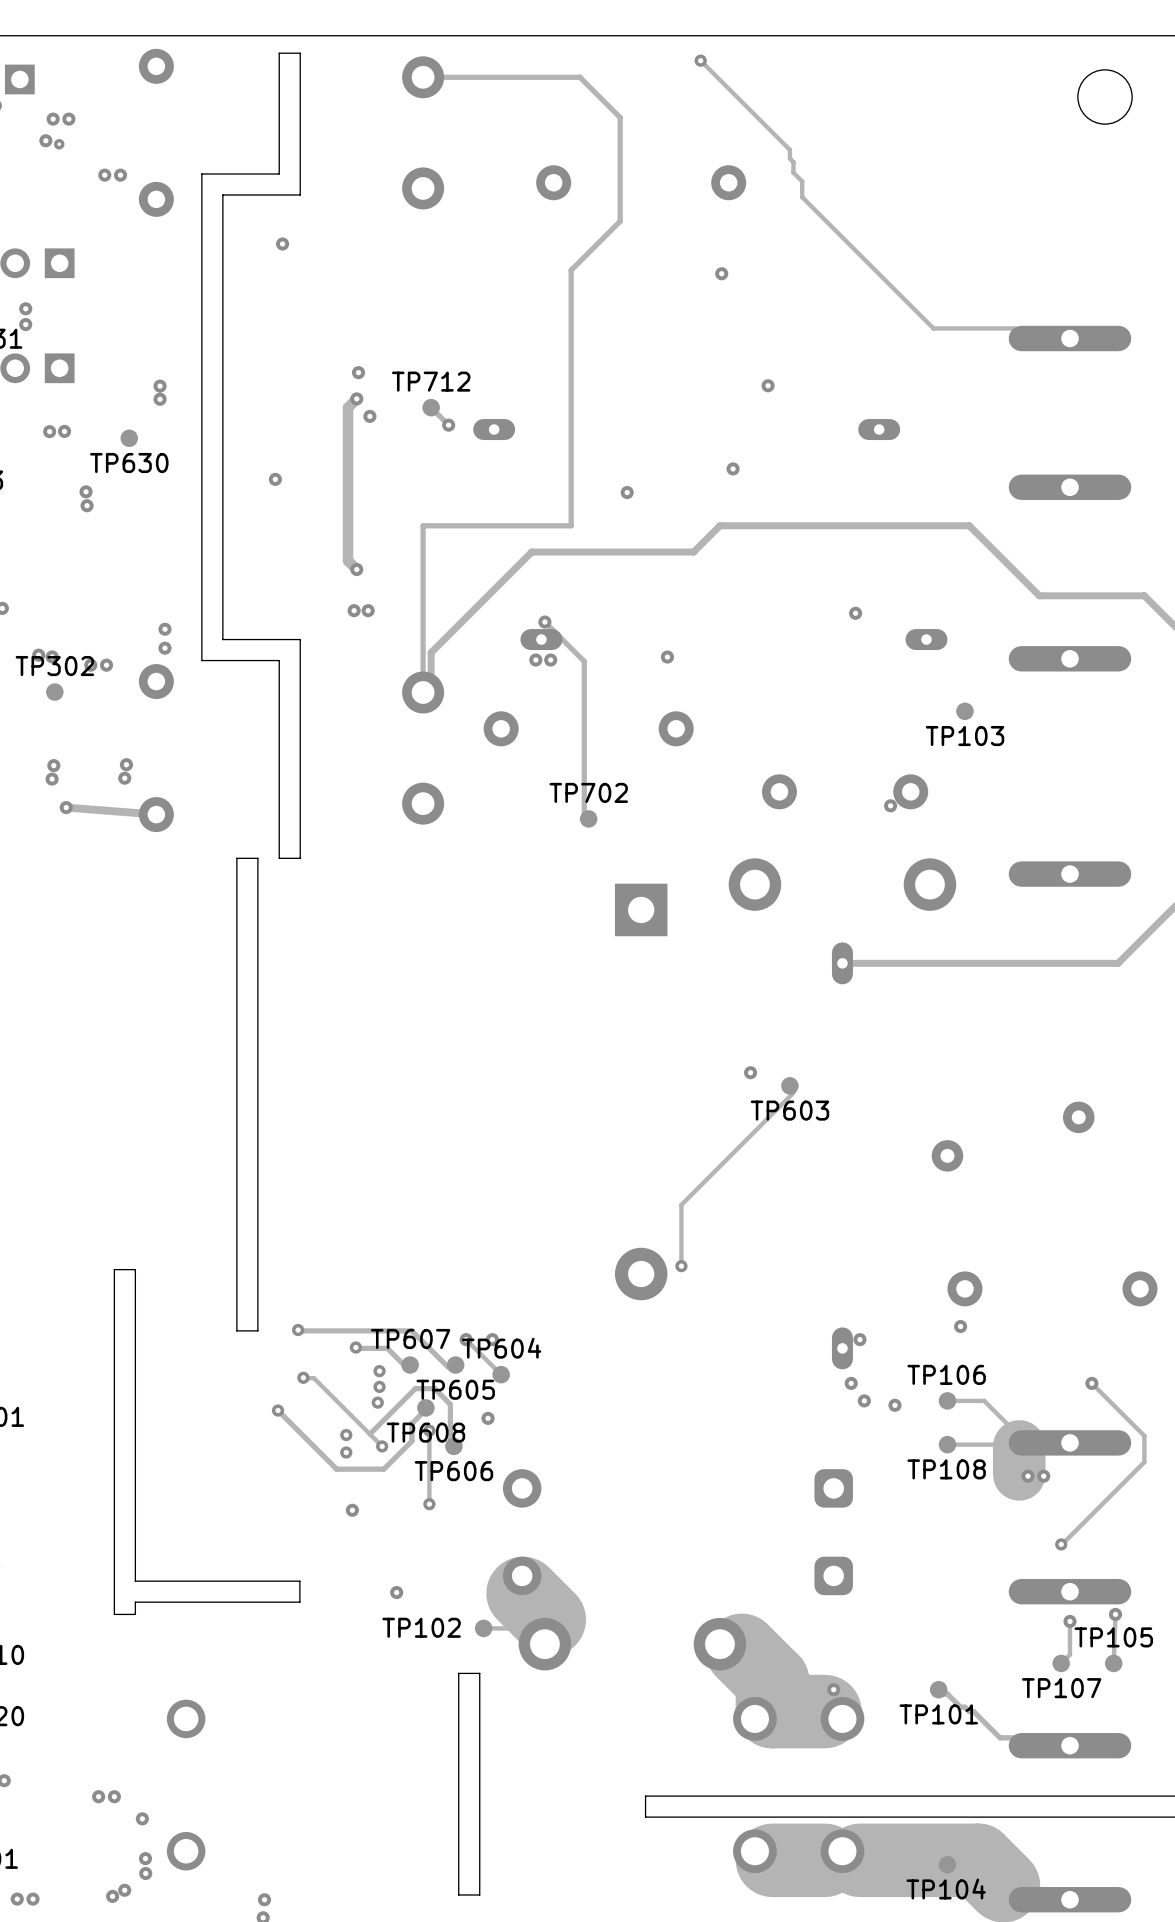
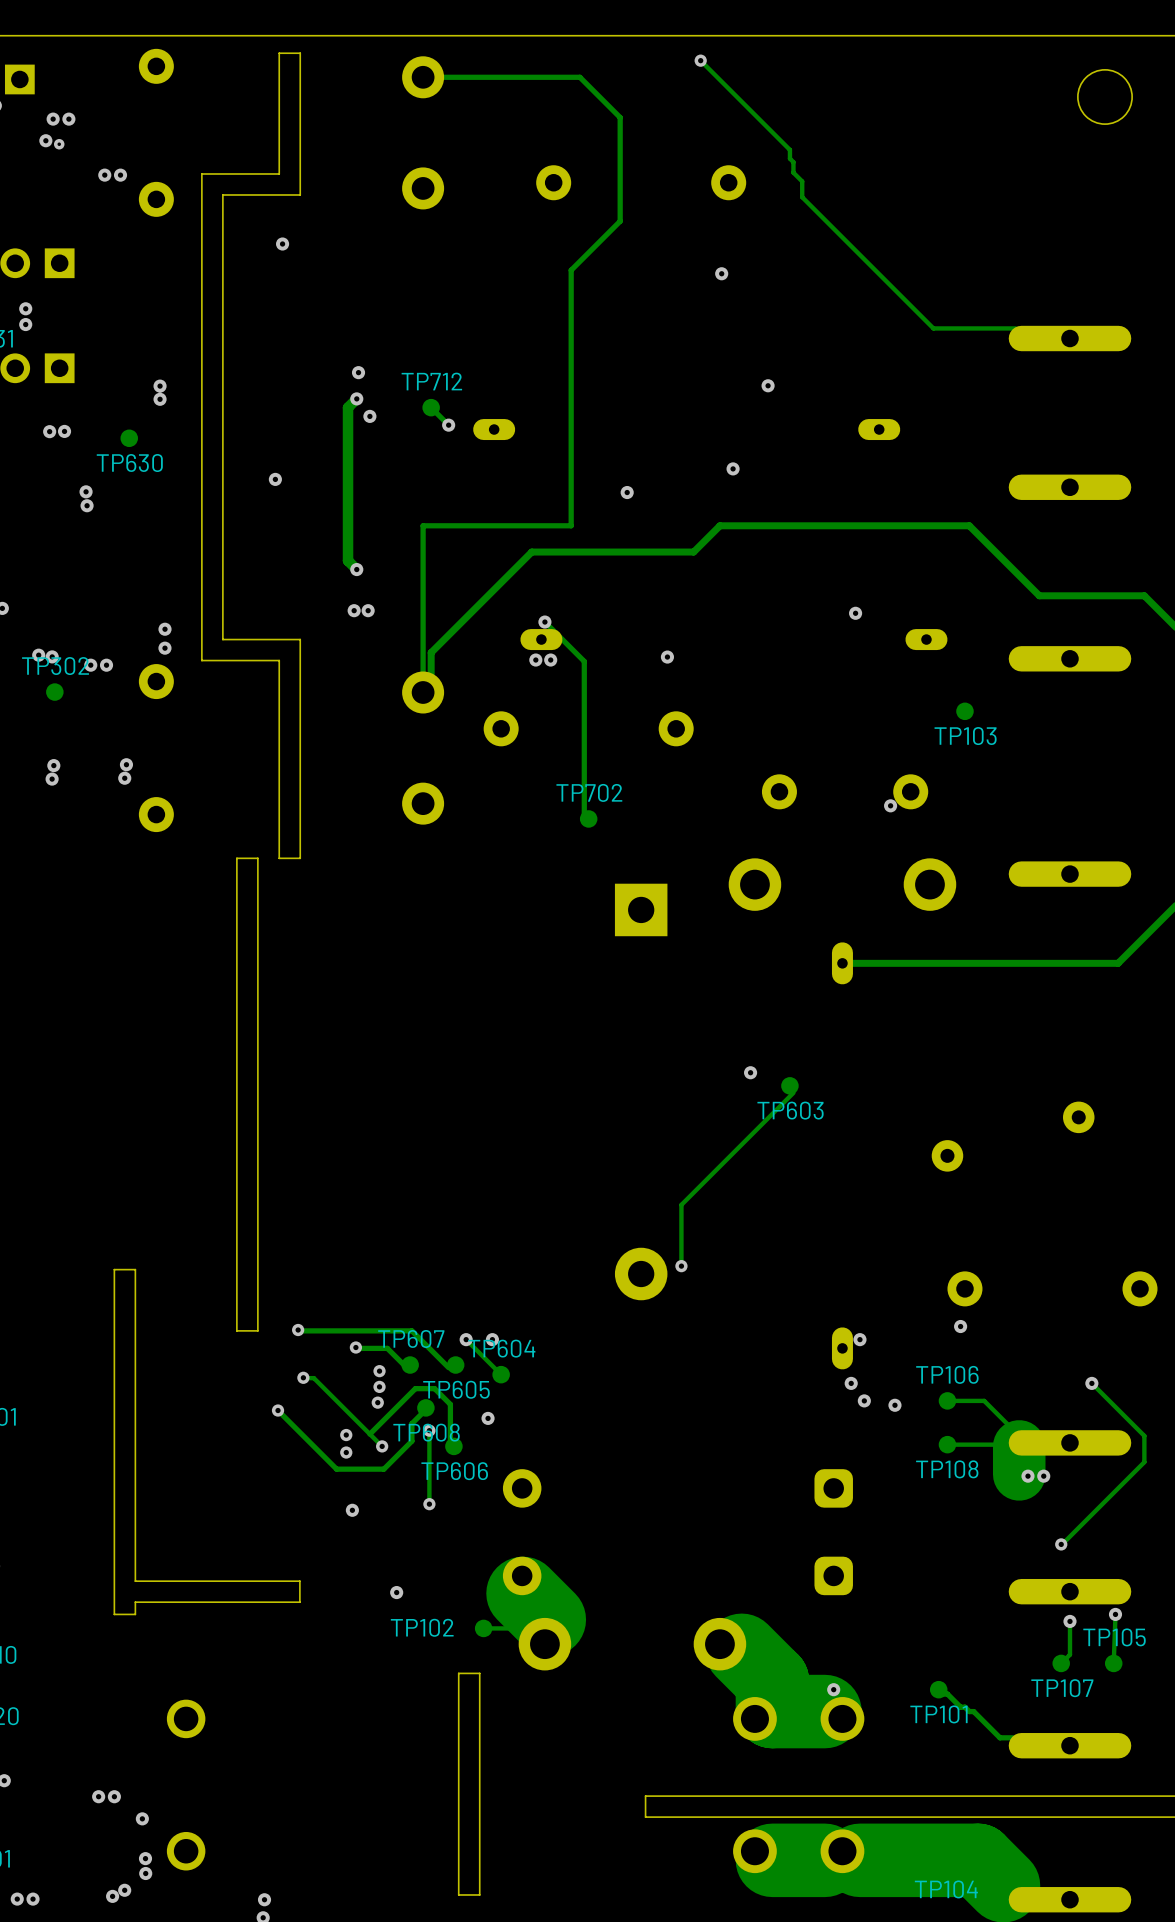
track: (66, 807) (156, 814) -> none
via: (66, 807) -> none

